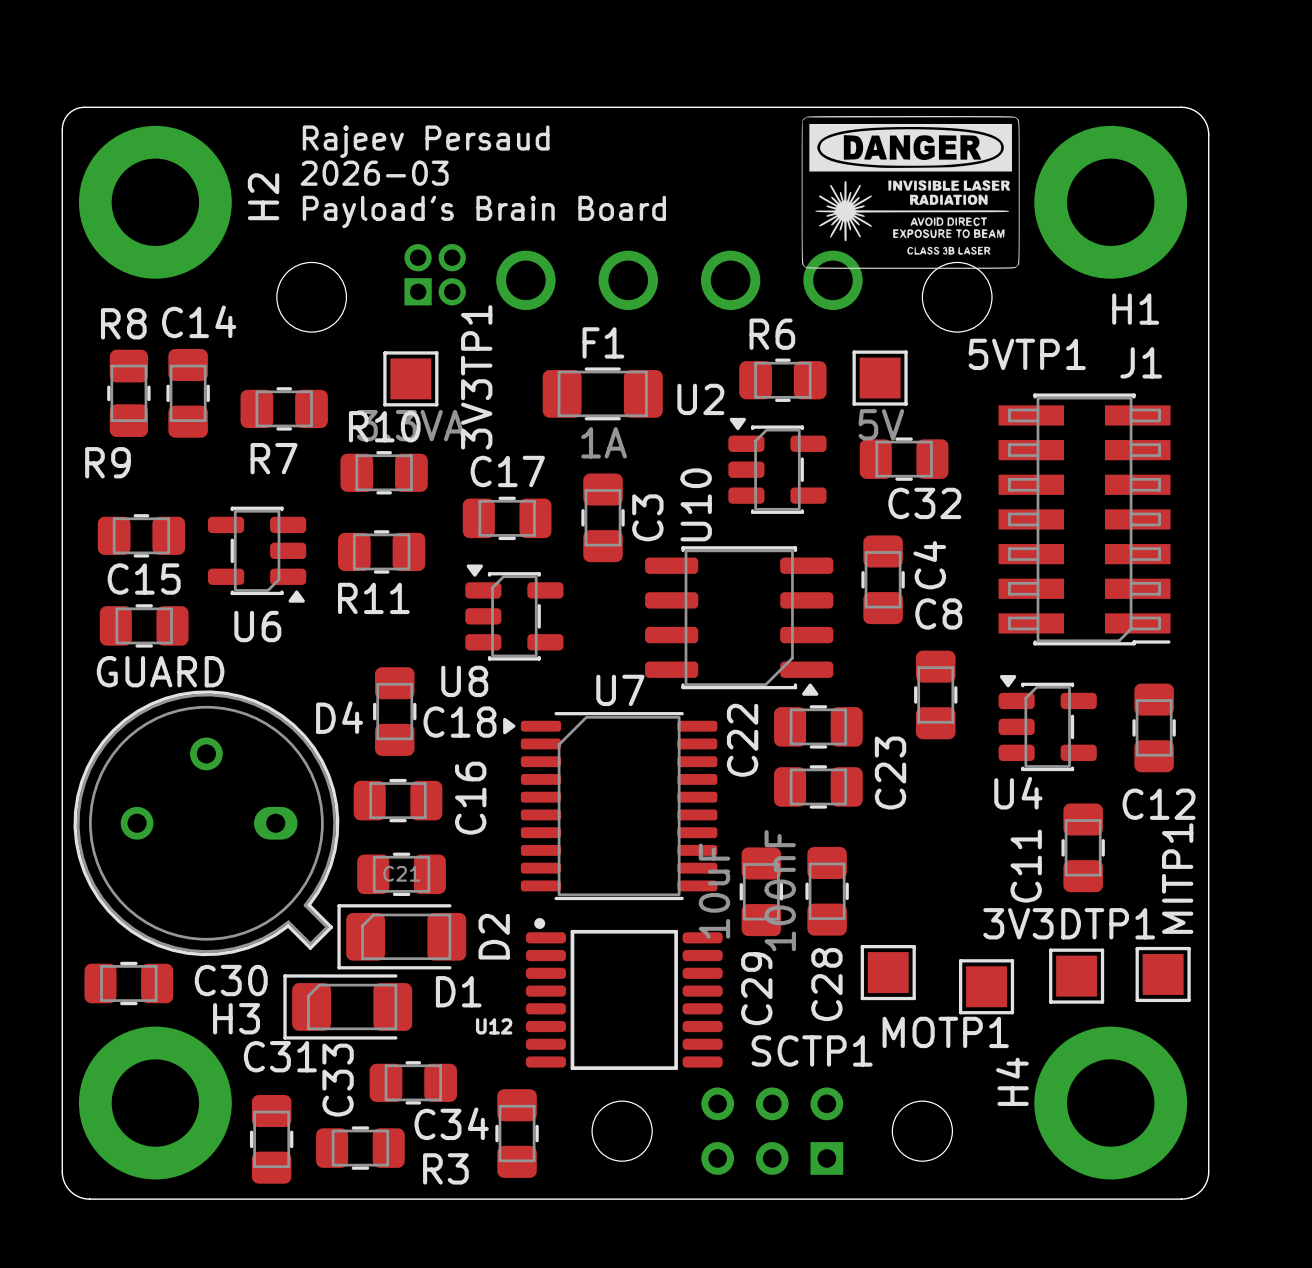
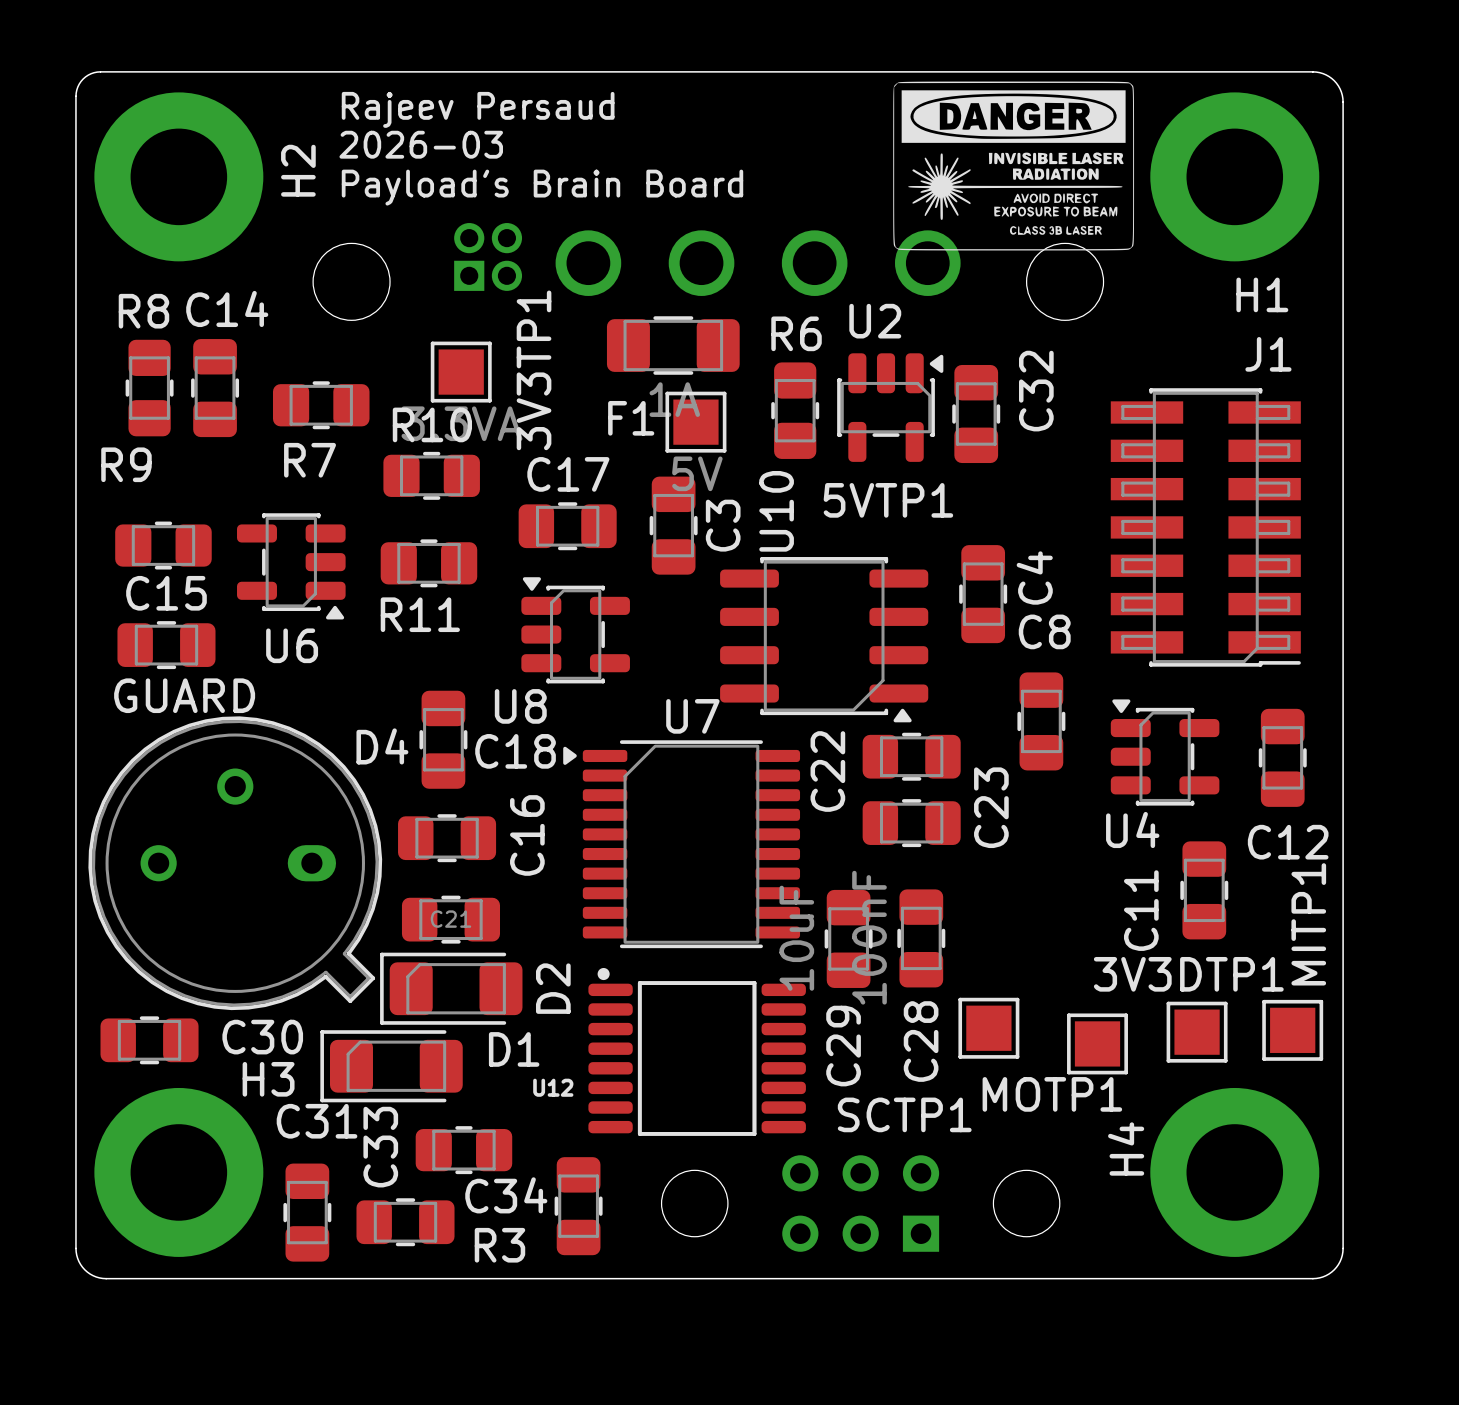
F1 name position: F1 (603, 342) -> F1 (631, 418)
5VTP1 name position: 5VTP1 (1027, 354) -> 5VTP1 (888, 500)
5VTP1 position: (880, 378) -> (695, 422)
R6 rotation: 0° (782, 380) -> 90° clockwise (795, 410)
R6 position: (782, 380) -> (795, 410)
F1 position: (602, 393) -> (673, 345)
U2 name position: U2 (700, 399) -> U2 (875, 321)
C32 rotation: 0° (904, 459) -> 90° clockwise (976, 414)
U2 rotation: 0° (777, 465) -> 90° clockwise (890, 407)
C32 name position: C32 (924, 503) -> C32 (1036, 391)

